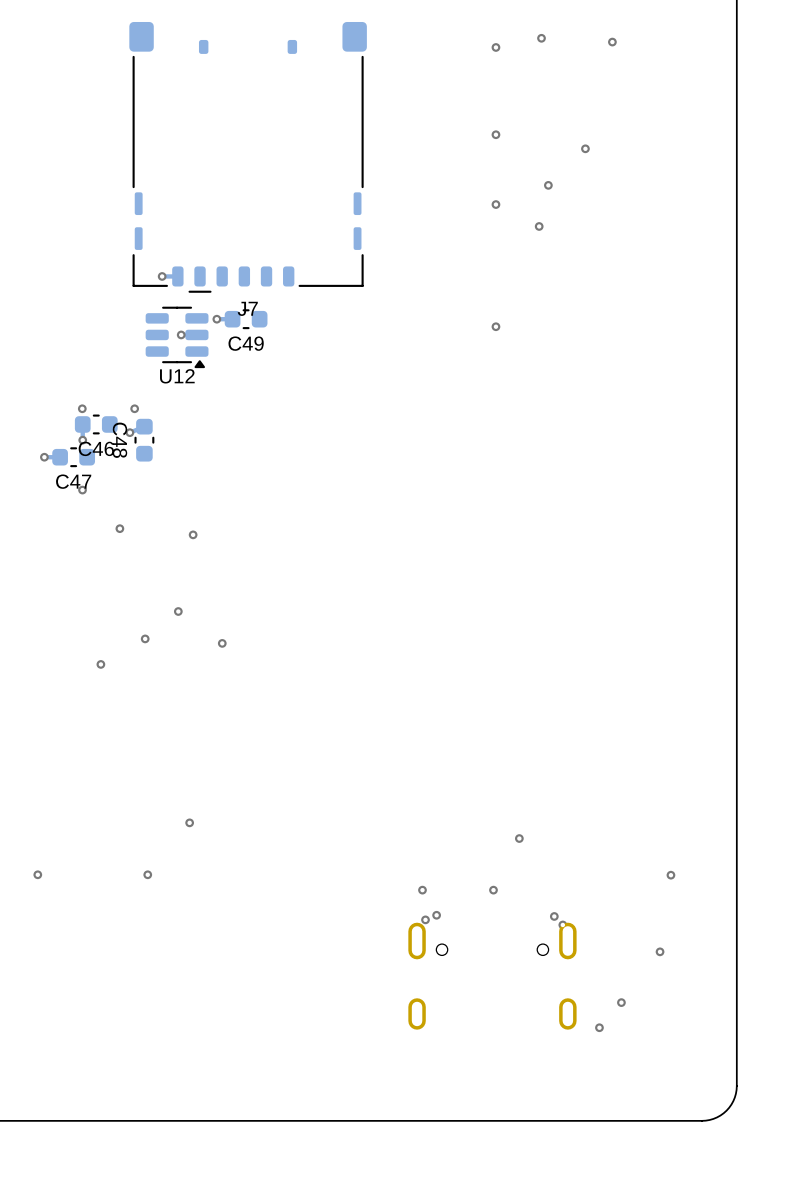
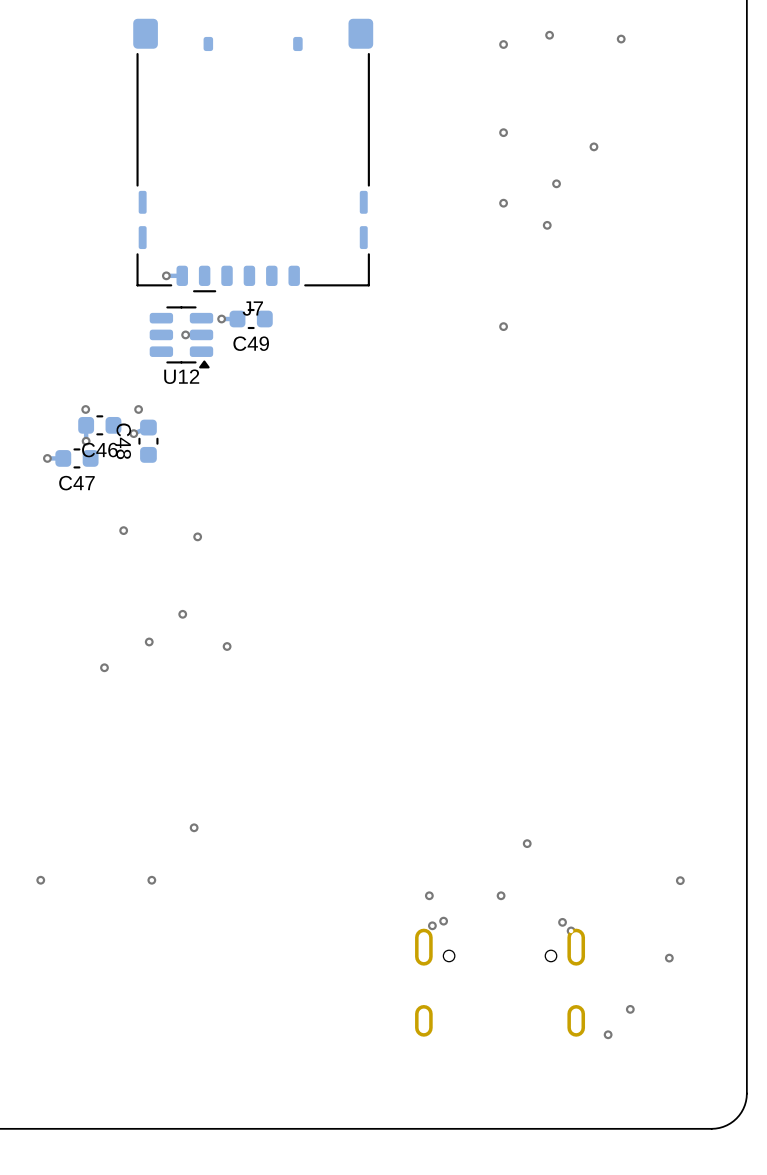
via: (82, 490) -> none

